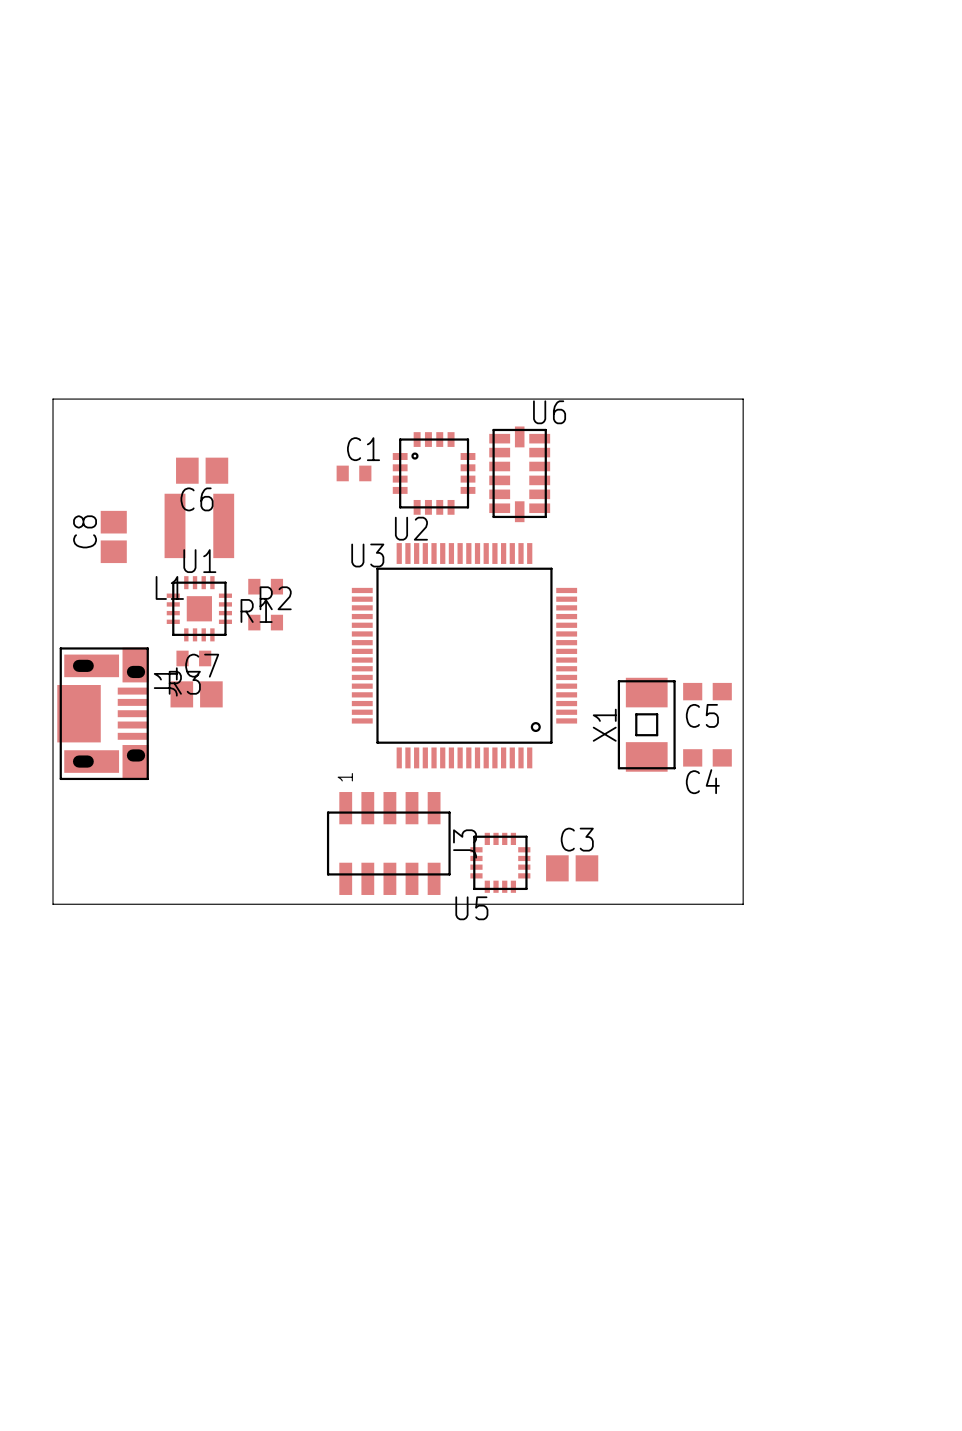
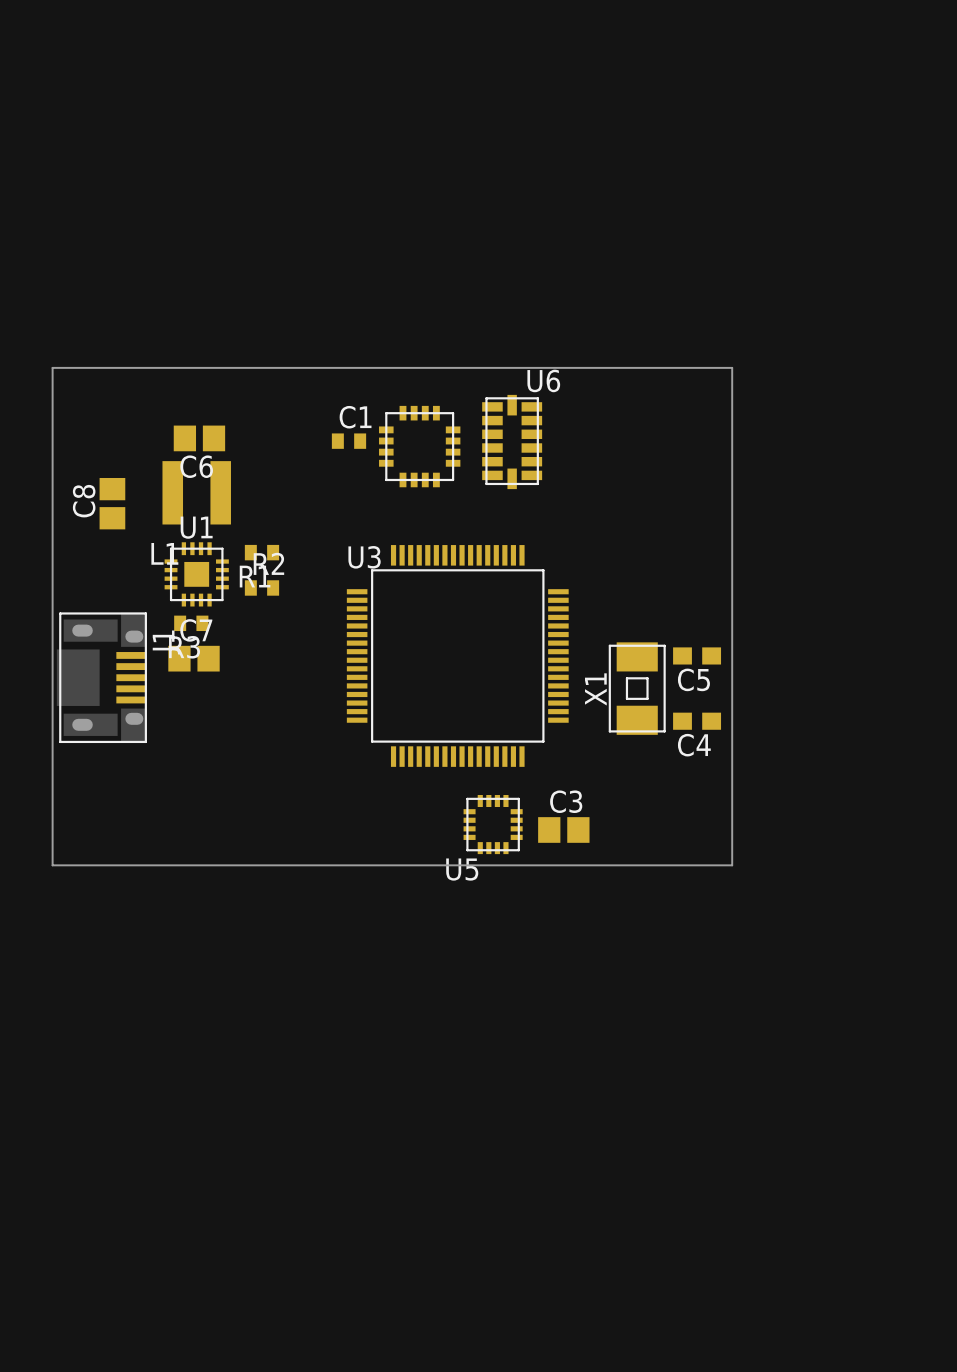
U2: (434, 473) -> none
part: none -> (419, 446)
U3 footprint: [351, 543, 578, 769] -> [346, 545, 569, 767]
J3: (388, 843) -> none

